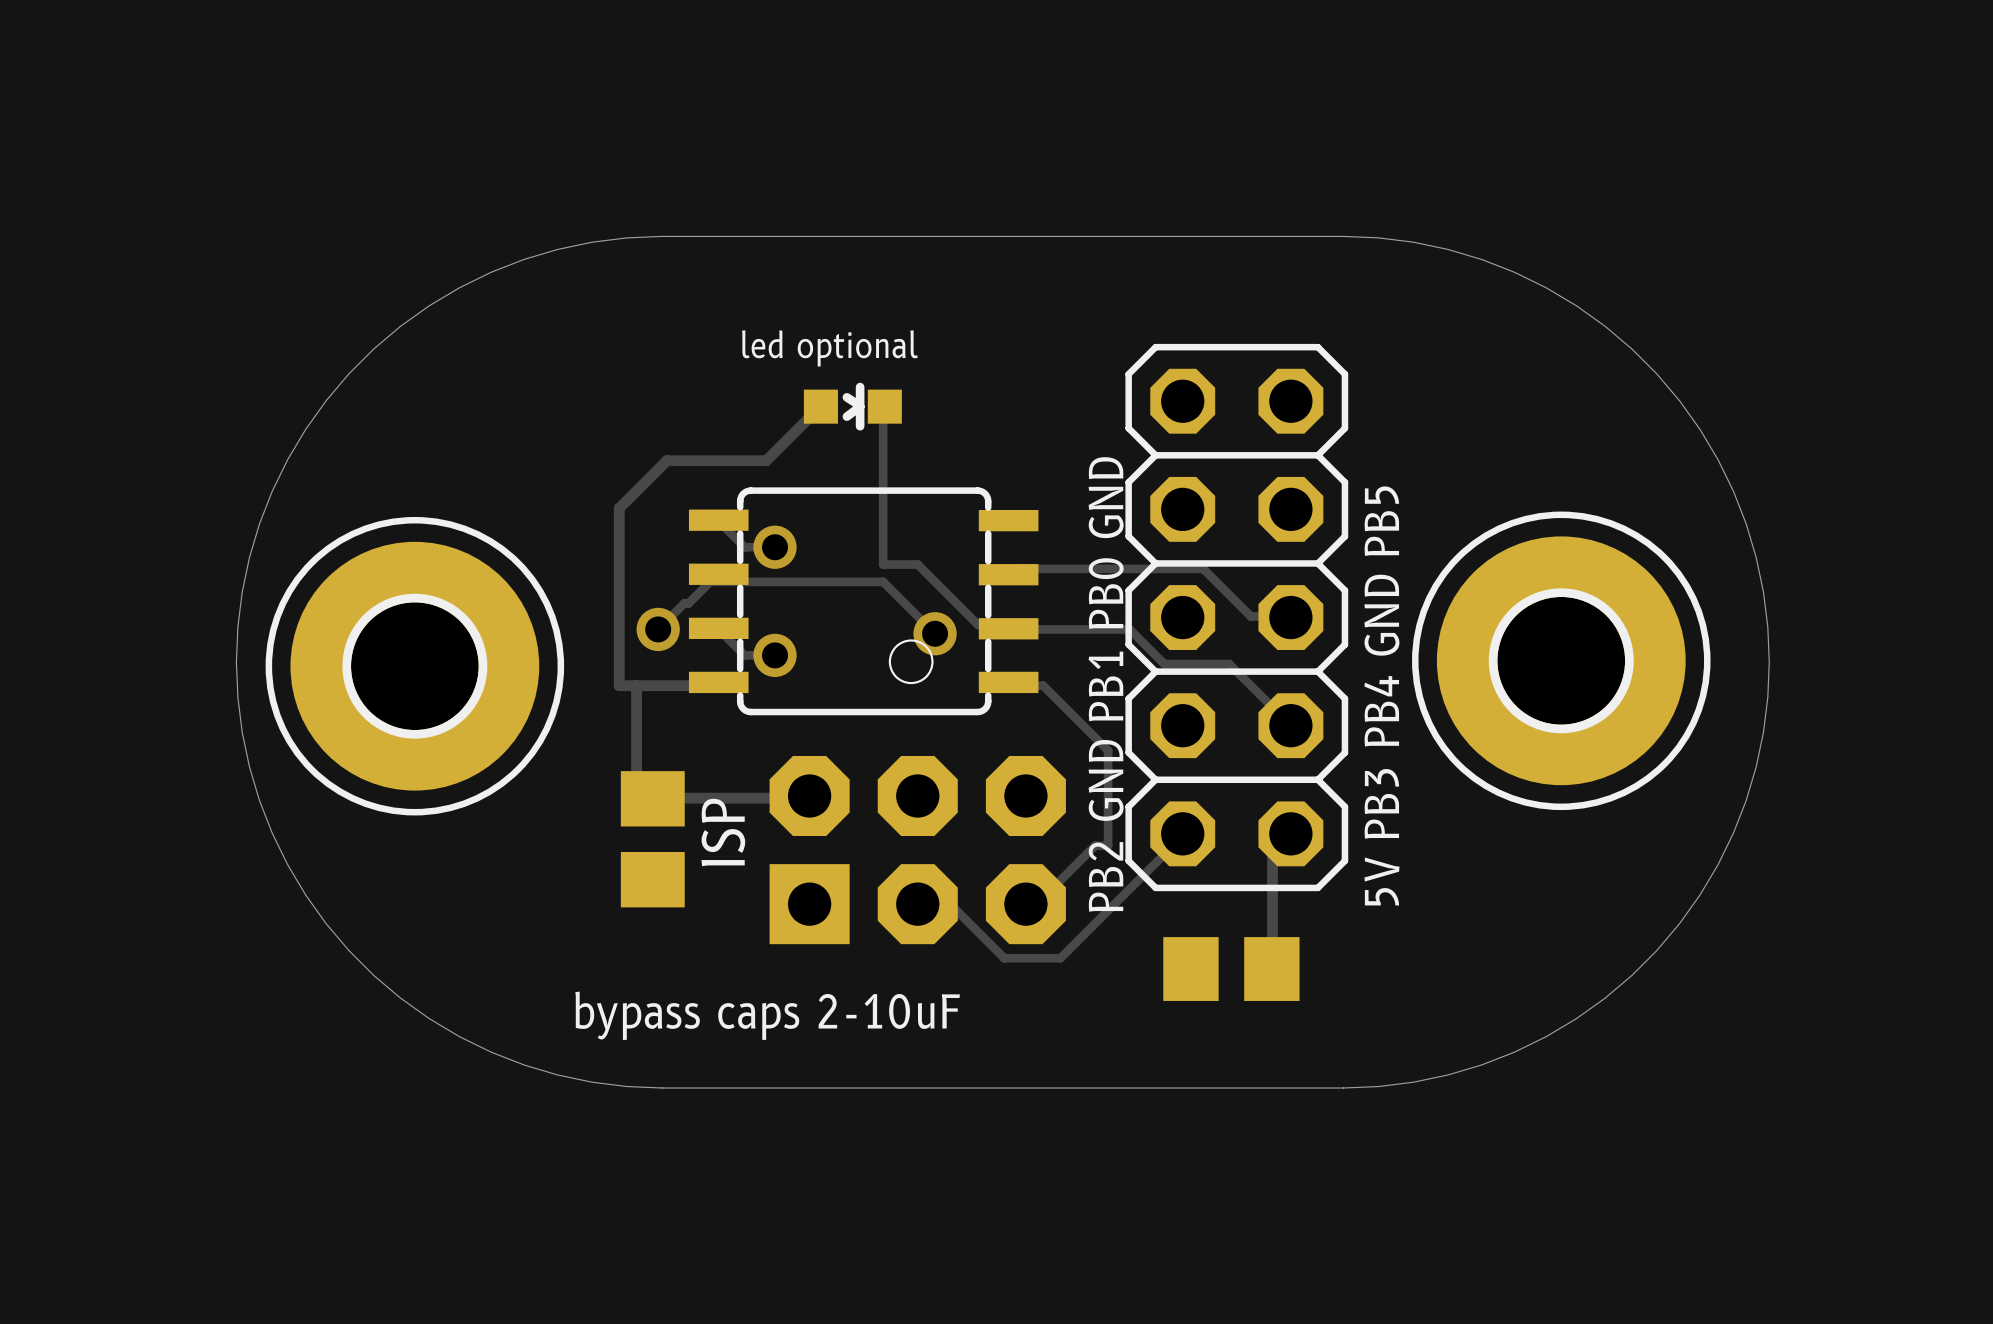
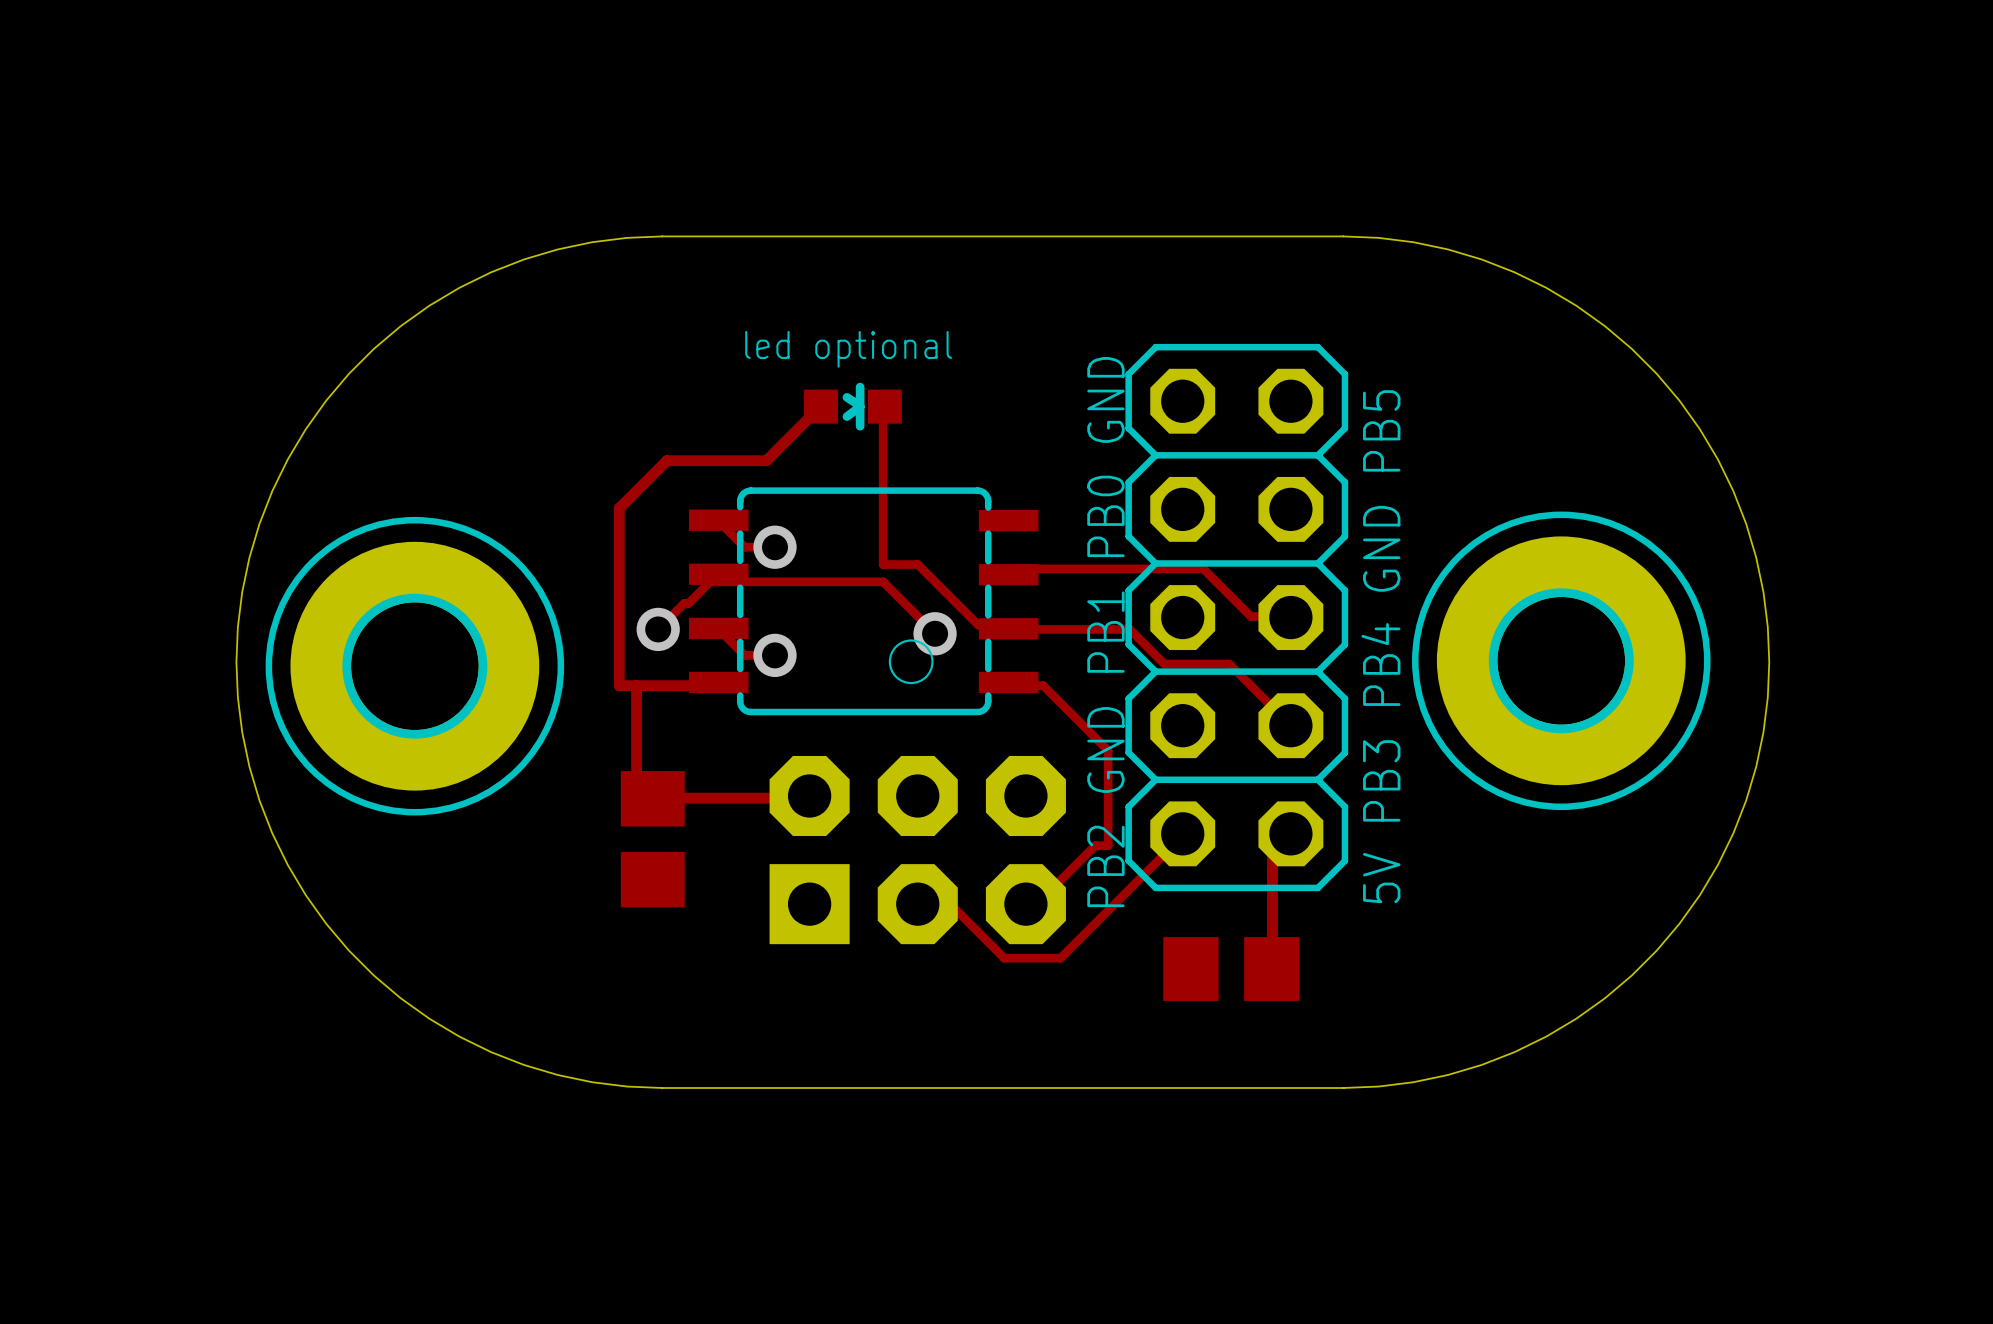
text: ISP (723, 832) -> none
text: bypass caps 2-10uF (767, 1015) -> none

